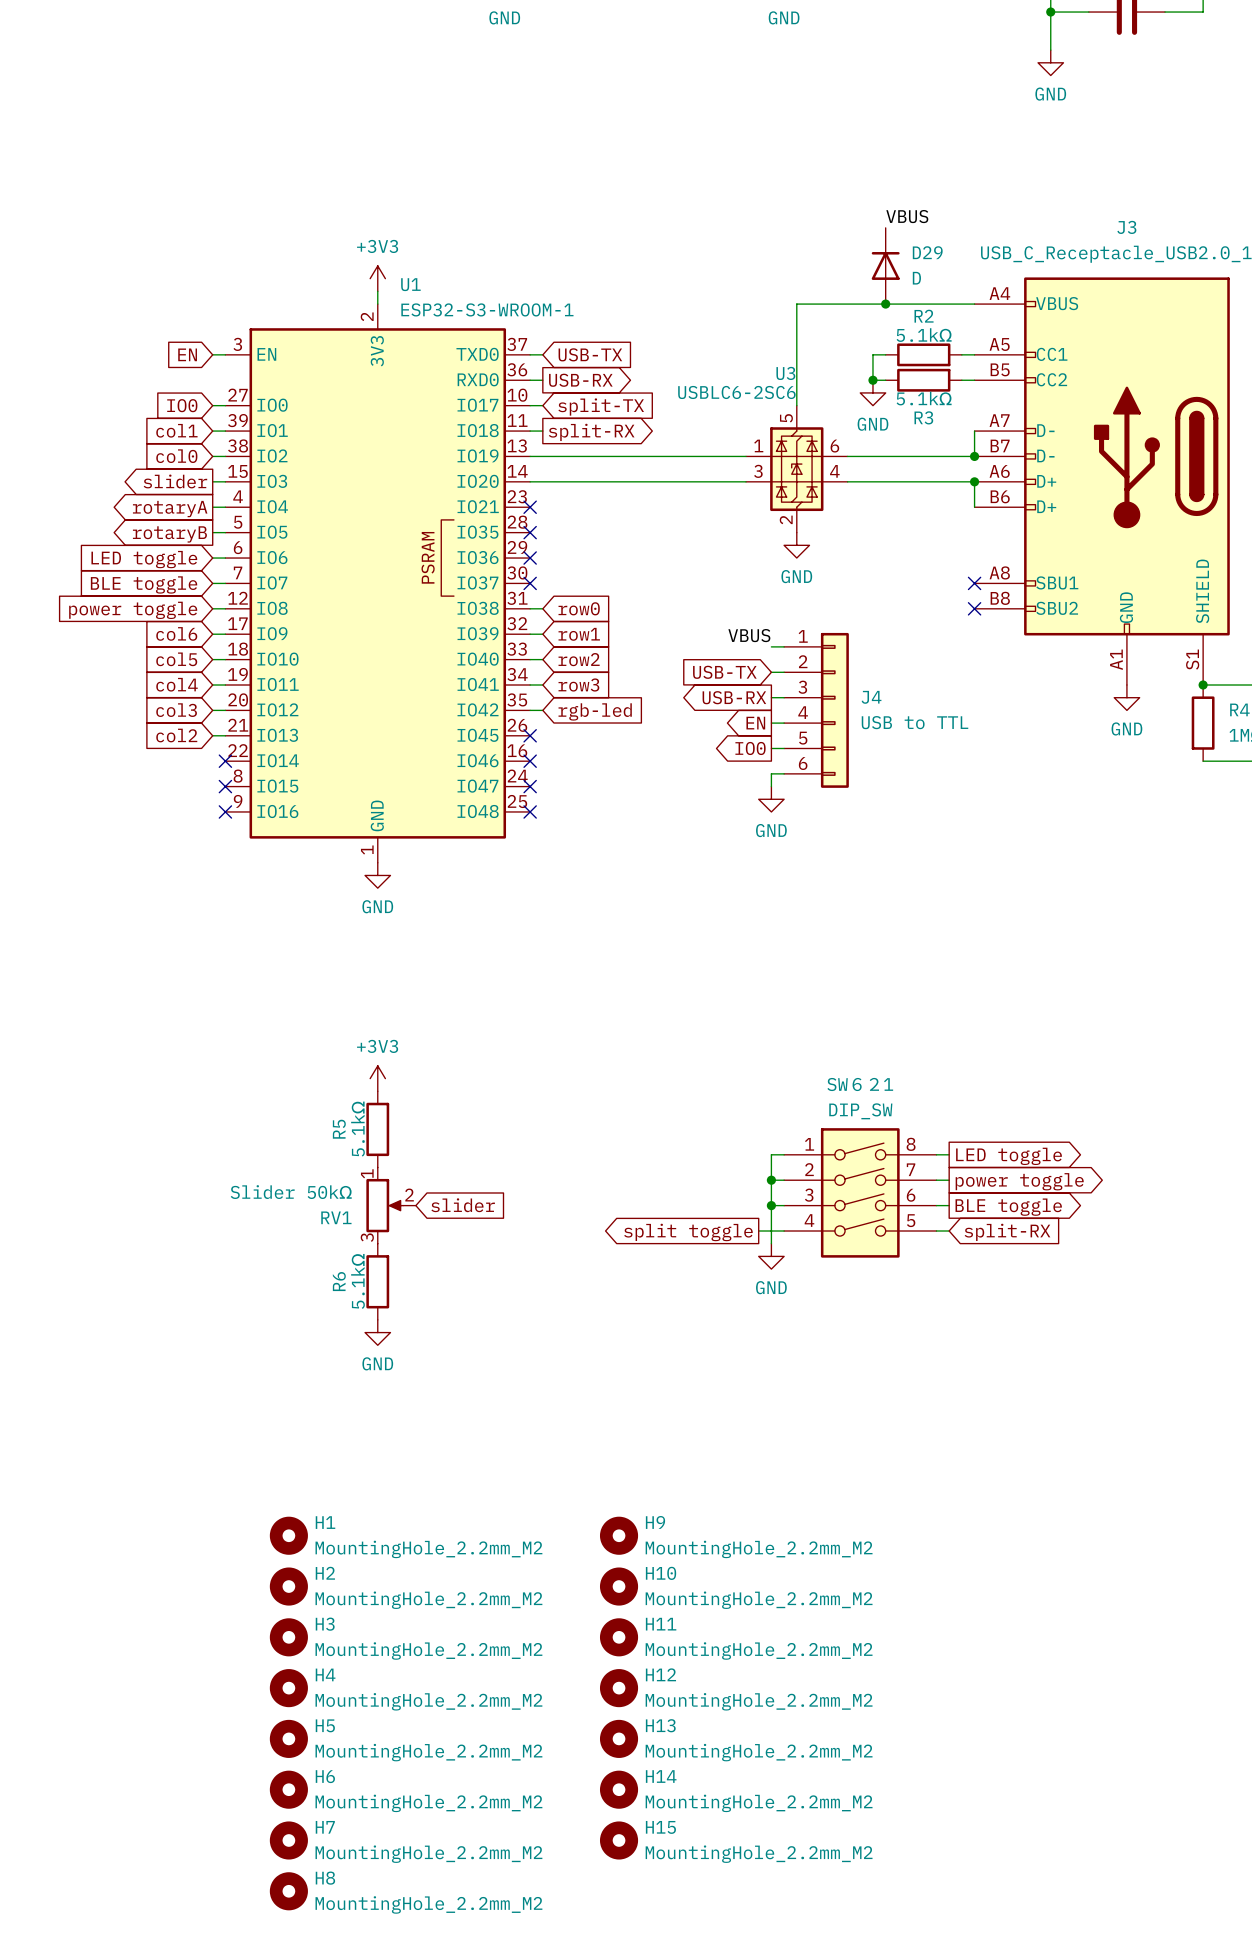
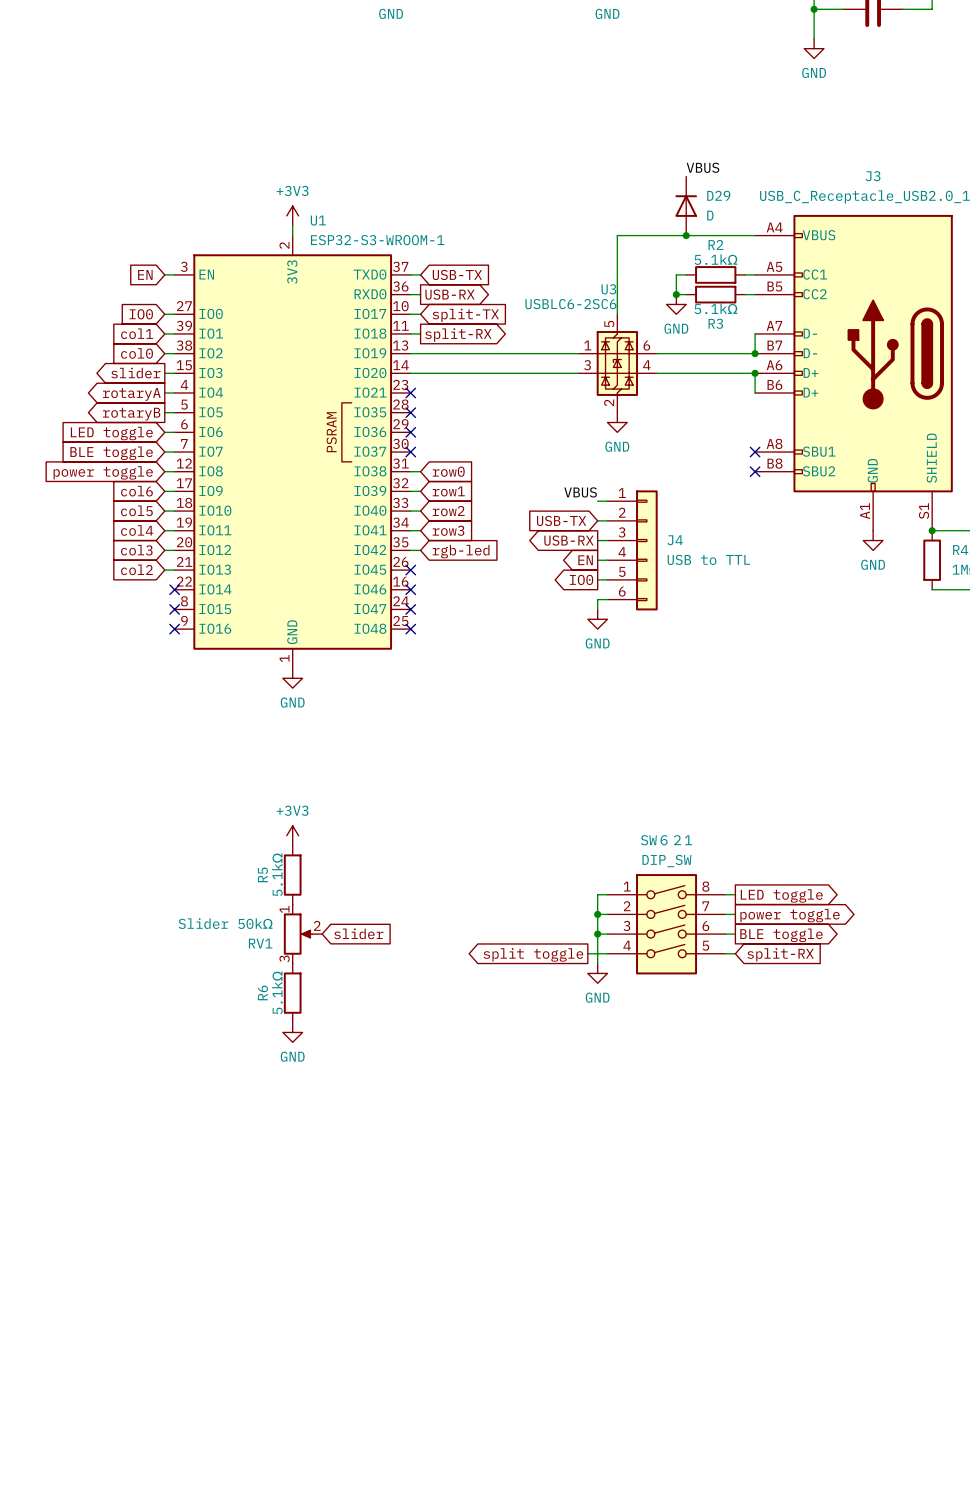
H1: MountingHole_2.2mm_M2 (288, 1535) -> none
H9: MountingHole_2.2mm_M2 (619, 1535) -> none
H2: MountingHole_2.2mm_M2 (288, 1586) -> none
H10: MountingHole_2.2mm_M2 (619, 1586) -> none
H3: MountingHole_2.2mm_M2 (288, 1637) -> none
H11: MountingHole_2.2mm_M2 (619, 1637) -> none
H4: MountingHole_2.2mm_M2 (288, 1688) -> none
H12: MountingHole_2.2mm_M2 (619, 1688) -> none
H5: MountingHole_2.2mm_M2 (288, 1738) -> none
H13: MountingHole_2.2mm_M2 (619, 1738) -> none
H6: MountingHole_2.2mm_M2 (288, 1789) -> none
H14: MountingHole_2.2mm_M2 (619, 1789) -> none
H7: MountingHole_2.2mm_M2 (288, 1840) -> none
H15: MountingHole_2.2mm_M2 (619, 1840) -> none
H8: MountingHole_2.2mm_M2 (288, 1891) -> none

